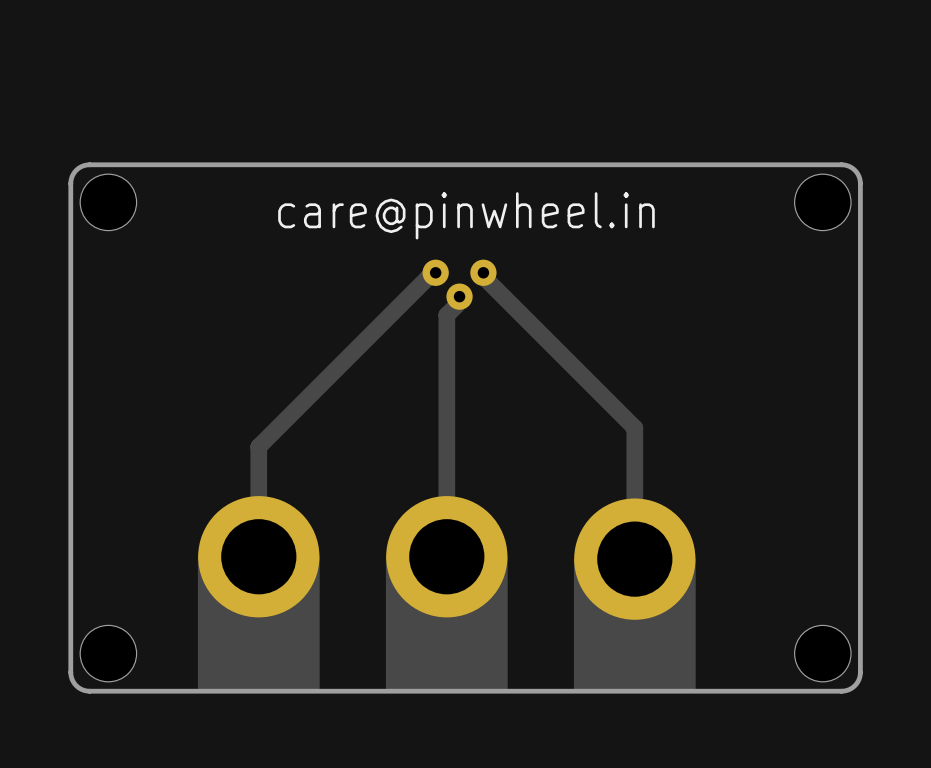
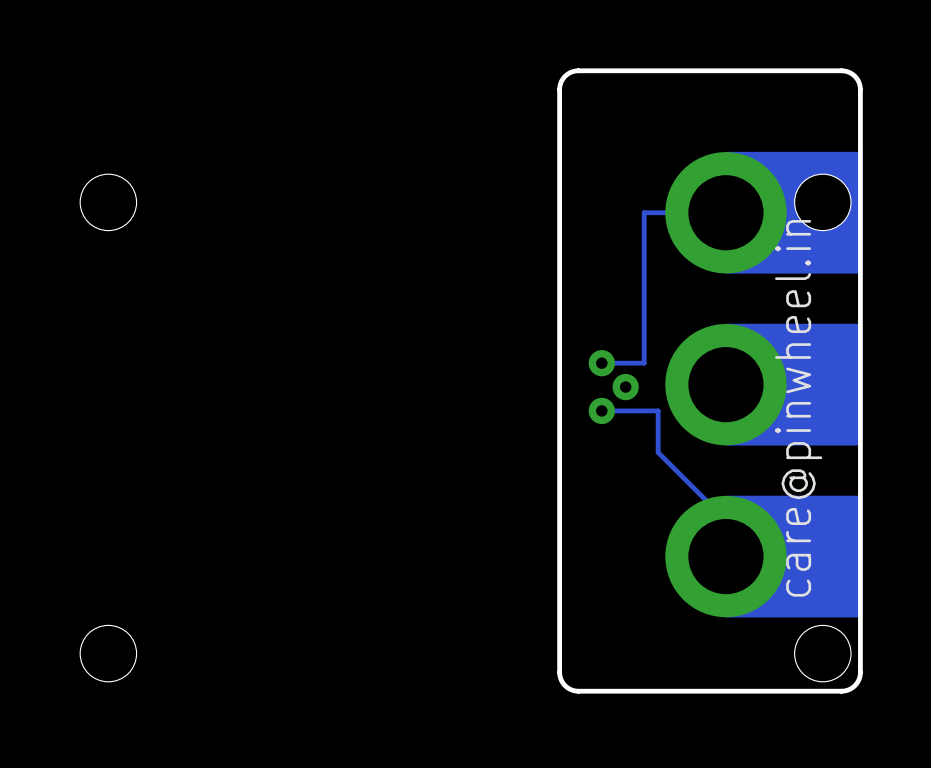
board edge: (860, 183) (854, 170) (841, 164) (89, 164) (80, 167) (73, 174) (70, 183) (70, 672) (76, 685) (89, 691) (578, 691) -> (860, 183) (860, 87) (856, 78) (848, 72) (578, 70) (569, 73) (562, 80) (559, 89) (559, 672) (565, 685) (578, 691)
track: none -> (725, 212) (644, 212) (644, 363) (601, 363)
part: none -> (761, 212)
text rotation: 0° (466, 215) -> 90° counterclockwise (798, 408)
track: (435, 272) (428, 277) (258, 446) (258, 556) -> none
track: (483, 272) (484, 277) (634, 428) (634, 559) -> none
part rotation: 0° (459, 284) -> 90° counterclockwise (613, 387)
part position: (459, 284) -> (613, 387)
track: (459, 296) (456, 305) (446, 315) (446, 556) -> none
part: none -> (761, 384)
track: none -> (601, 410) (658, 410) (658, 452) (711, 505) (725, 505) (725, 556)
part: none -> (761, 556)
part: (258, 592) -> none
part: (446, 592) -> none
part: (634, 595) -> none

